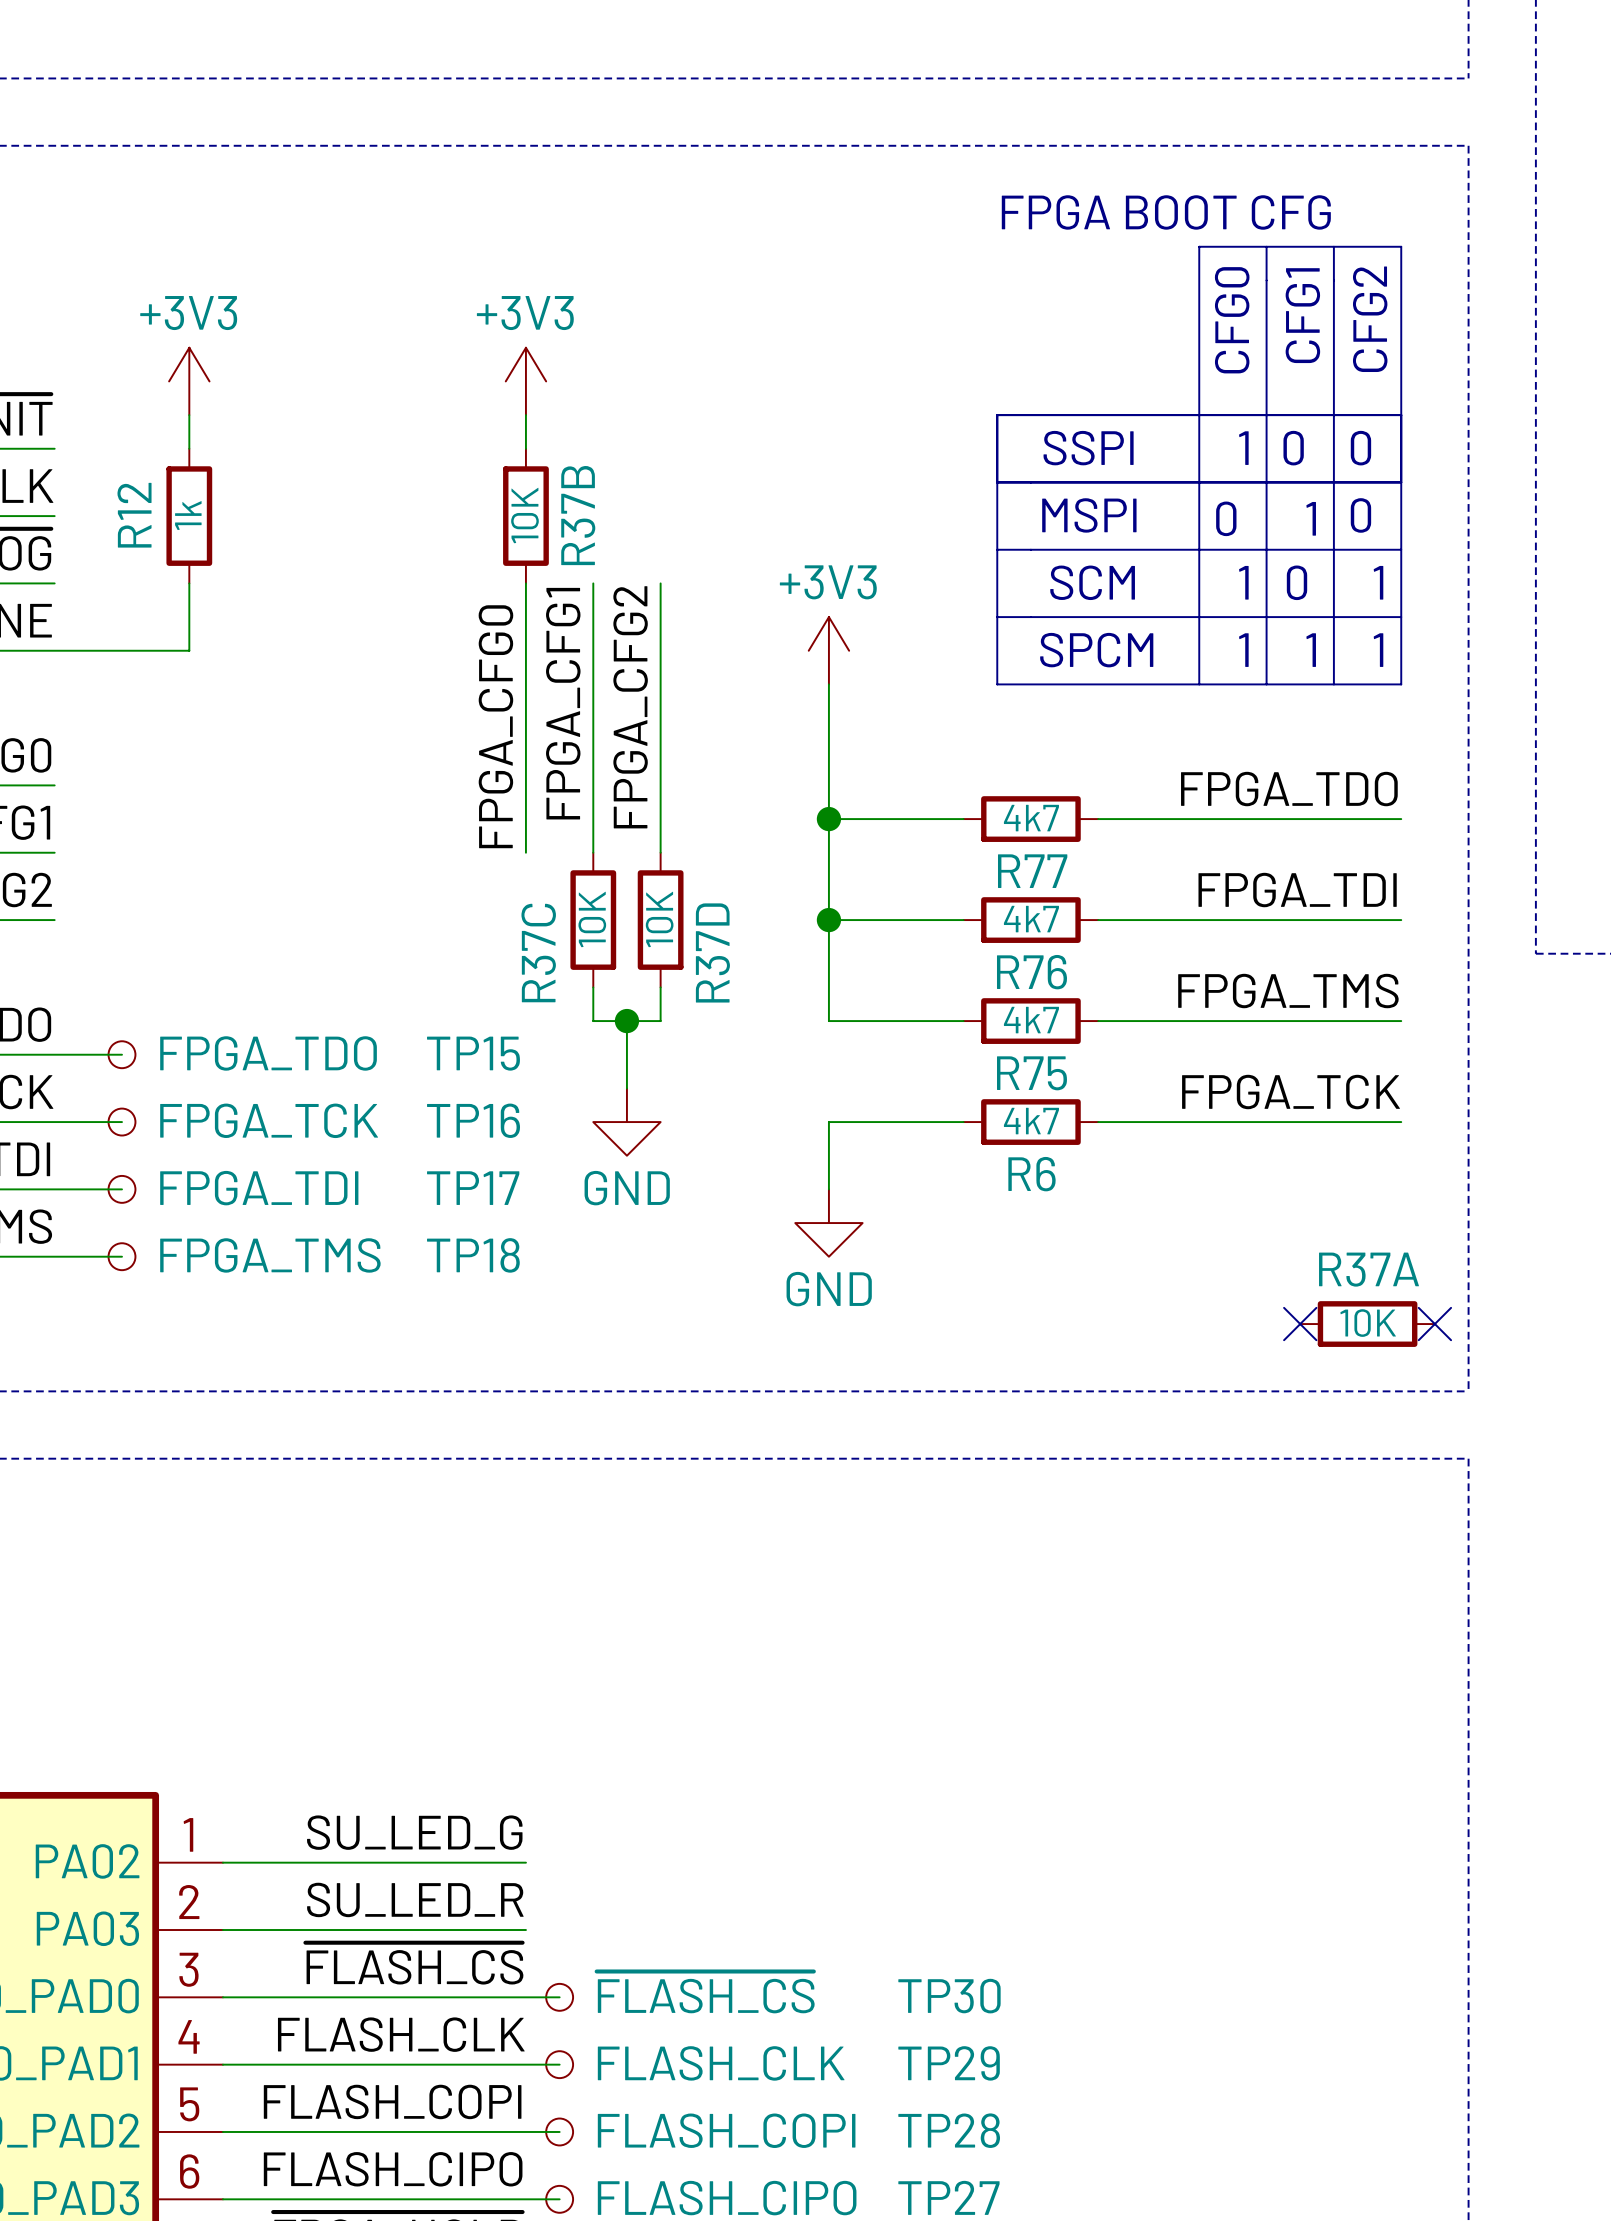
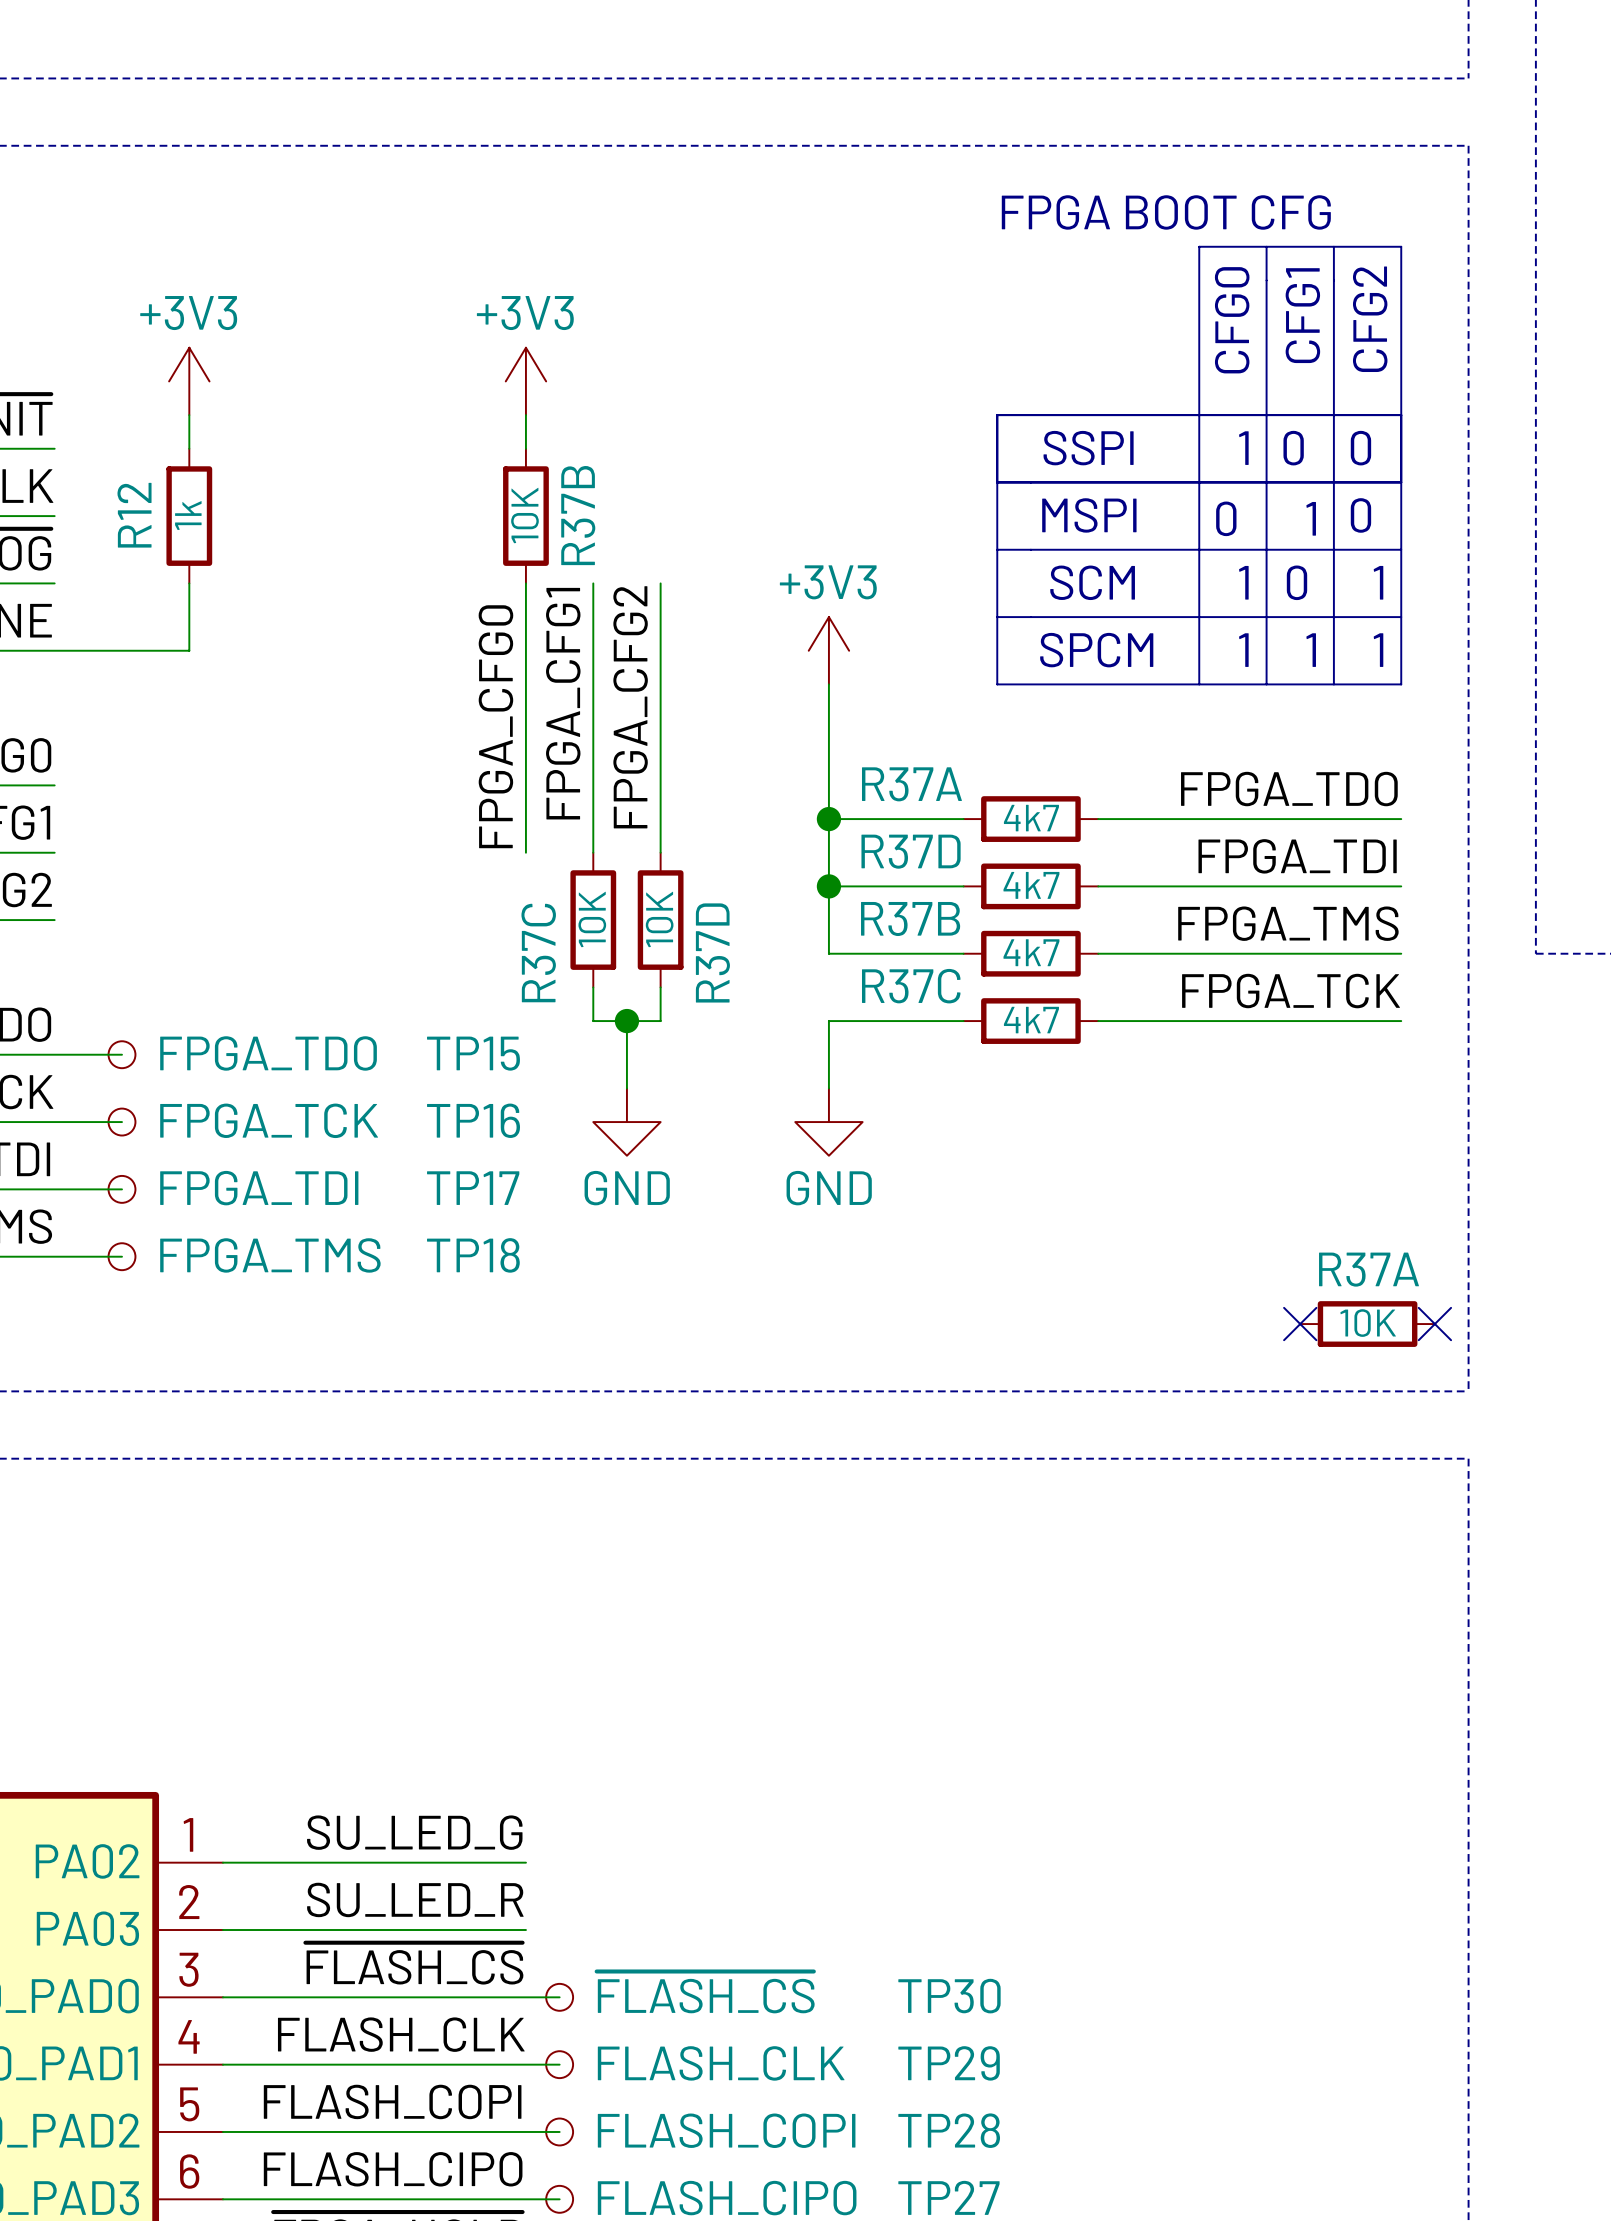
R77 name: R77 (1032, 871) -> R37A (911, 784)
R37D: none -> 4k7 (1030, 886)
label position: FPGA_TDI (1297, 890) -> FPGA_TDI (1297, 856)
wire: (828, 920) (963, 920) -> (828, 886) (963, 886)
junction position: (828, 920) -> (828, 886)
R76: 4k7 (1030, 920) -> none
wire: (1098, 920) (1401, 920) -> (1098, 886) (1401, 886)
label: none -> FPGA_TMS (1288, 923)
wire: (828, 953) (828, 1021) -> (828, 1088) (828, 1021)
wire: none -> (828, 953) (963, 953)
R37B: none -> 4k7 (1030, 953)
label: FPGA_TMS (1288, 991) -> FPGA_TCK (1291, 991)
R75 name: R75 (1031, 1073) -> R37C (911, 986)
label: FPGA_TCK (1291, 1092) -> none
wire: (963, 1122) (828, 1122) (828, 1189) -> none
R6: 4k7 (1030, 1122) -> none
wire: (1098, 1122) (1401, 1122) -> (1098, 953) (1401, 953)
power symbol position: GND (828, 1223) -> GND (828, 1122)

